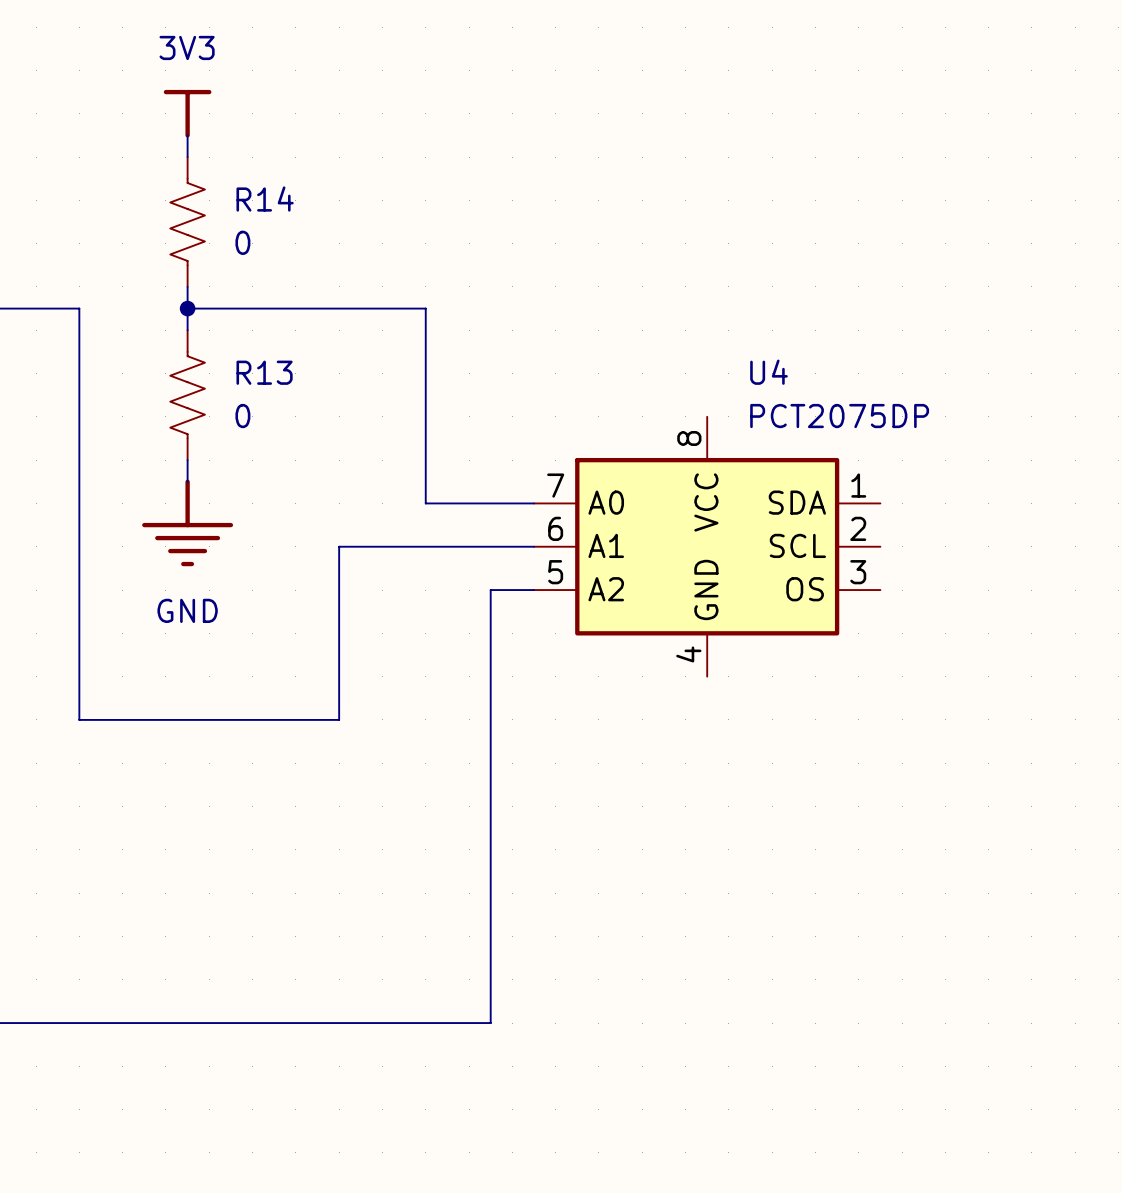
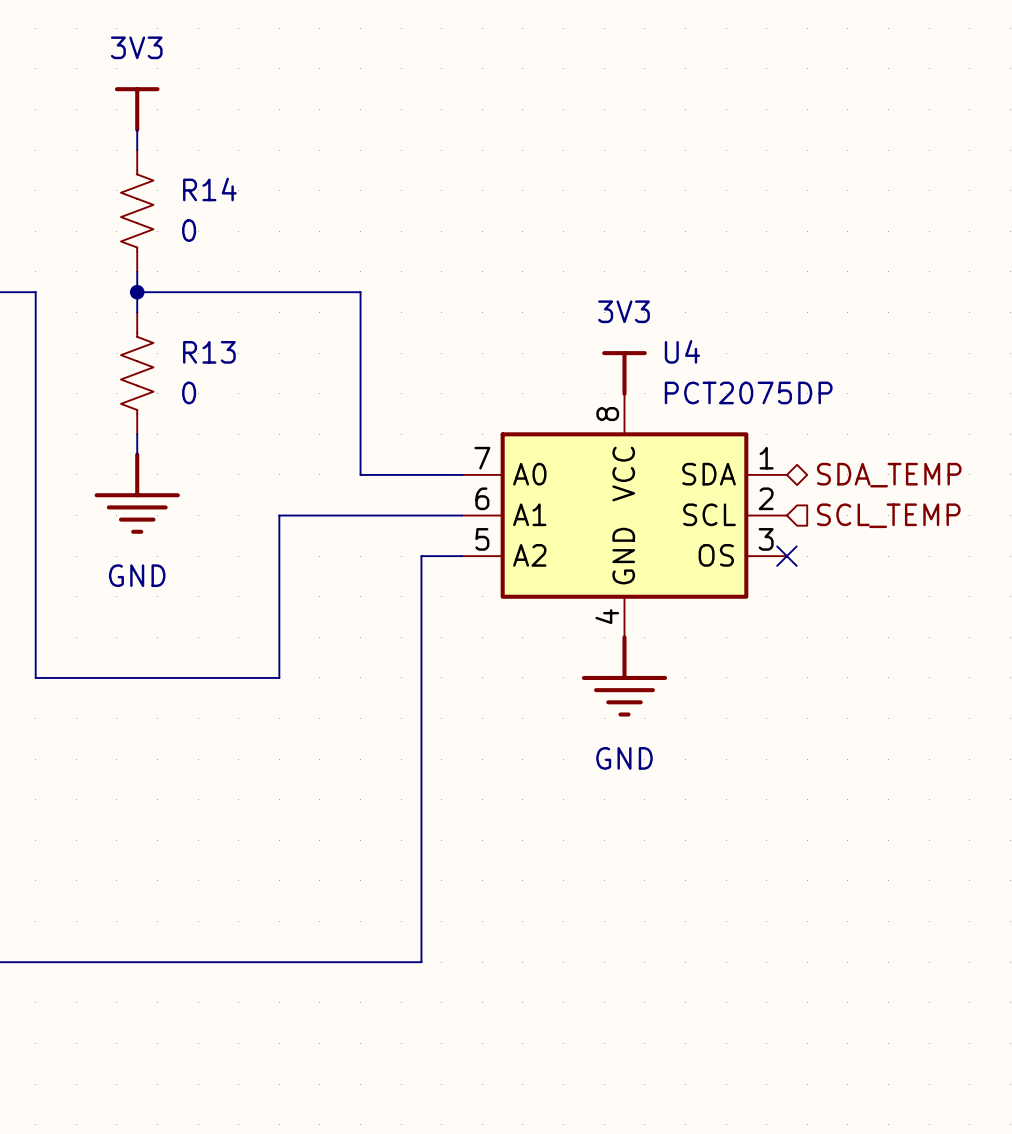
power symbol: none -> 3V3 (624, 373)
hierarchical label: none -> SDA_TEMP (889, 475)
hierarchical label: none -> SCL_TEMP (888, 515)
no-connect mark: none -> (786, 556)
power symbol: none -> GND (624, 675)

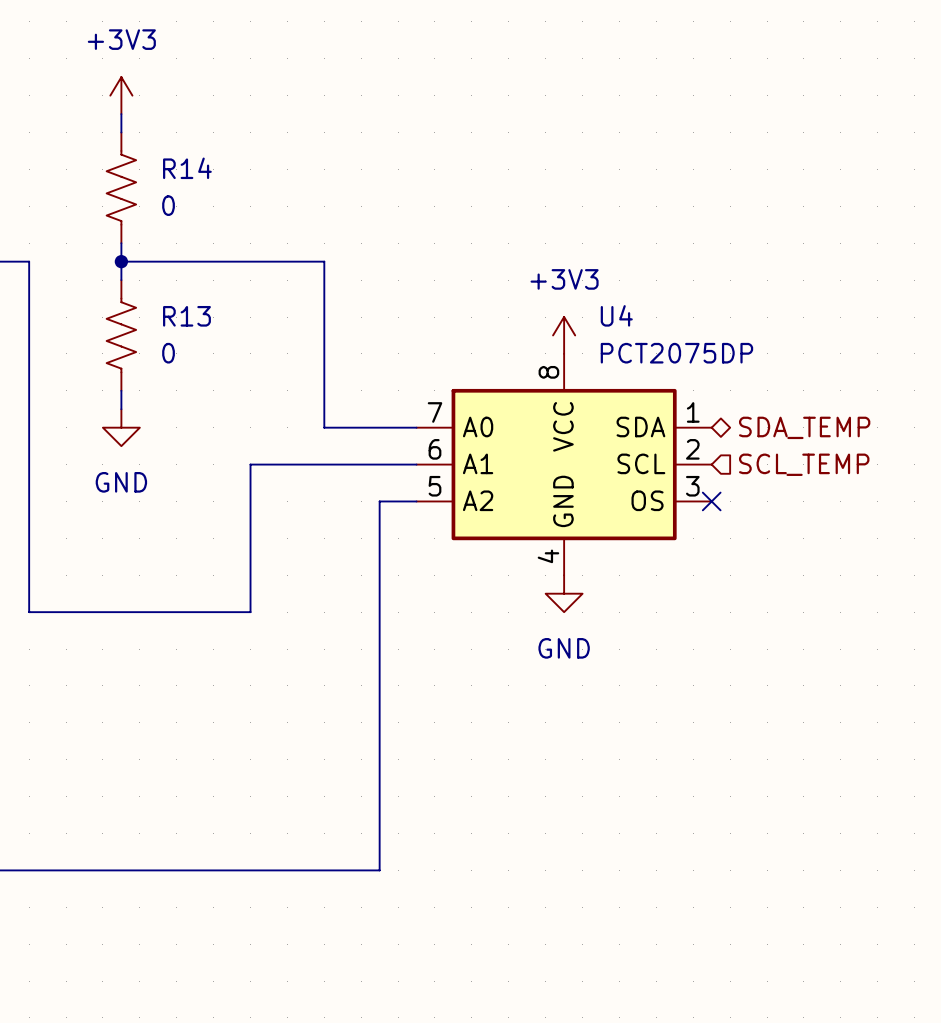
power symbol: 3V3 (137, 109) -> +3V3 (121, 95)
power symbol: 3V3 (624, 373) -> +3V3 (564, 335)
power symbol: none -> GND (121, 427)
power symbol: GND (137, 493) -> none
power symbol: none -> GND (564, 593)
power symbol: GND (624, 675) -> none

